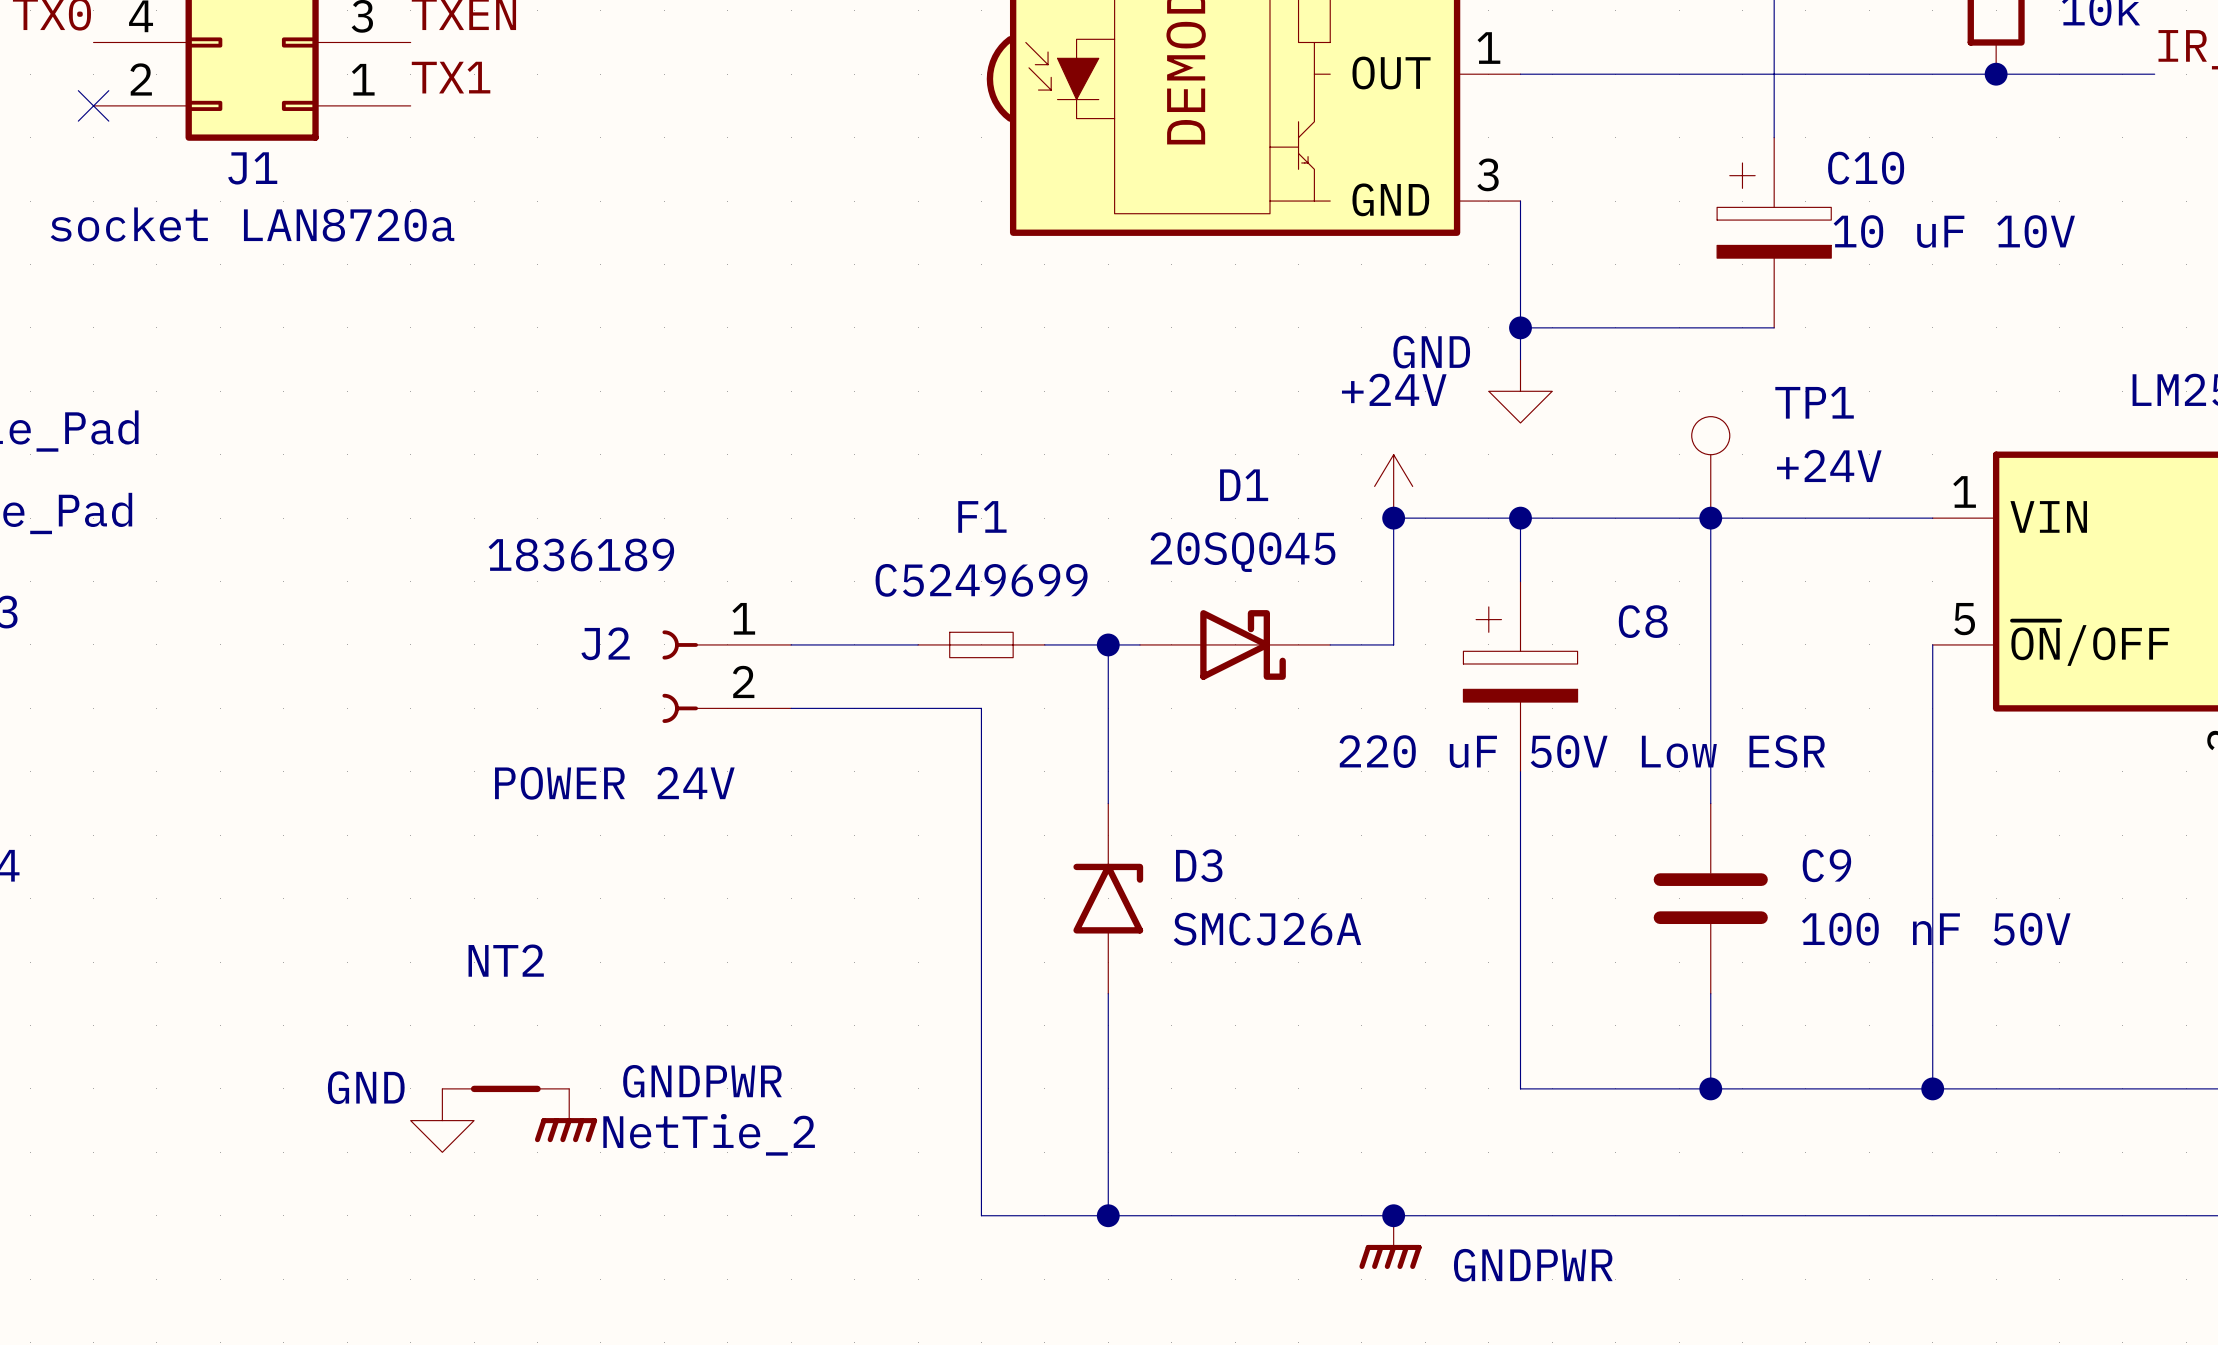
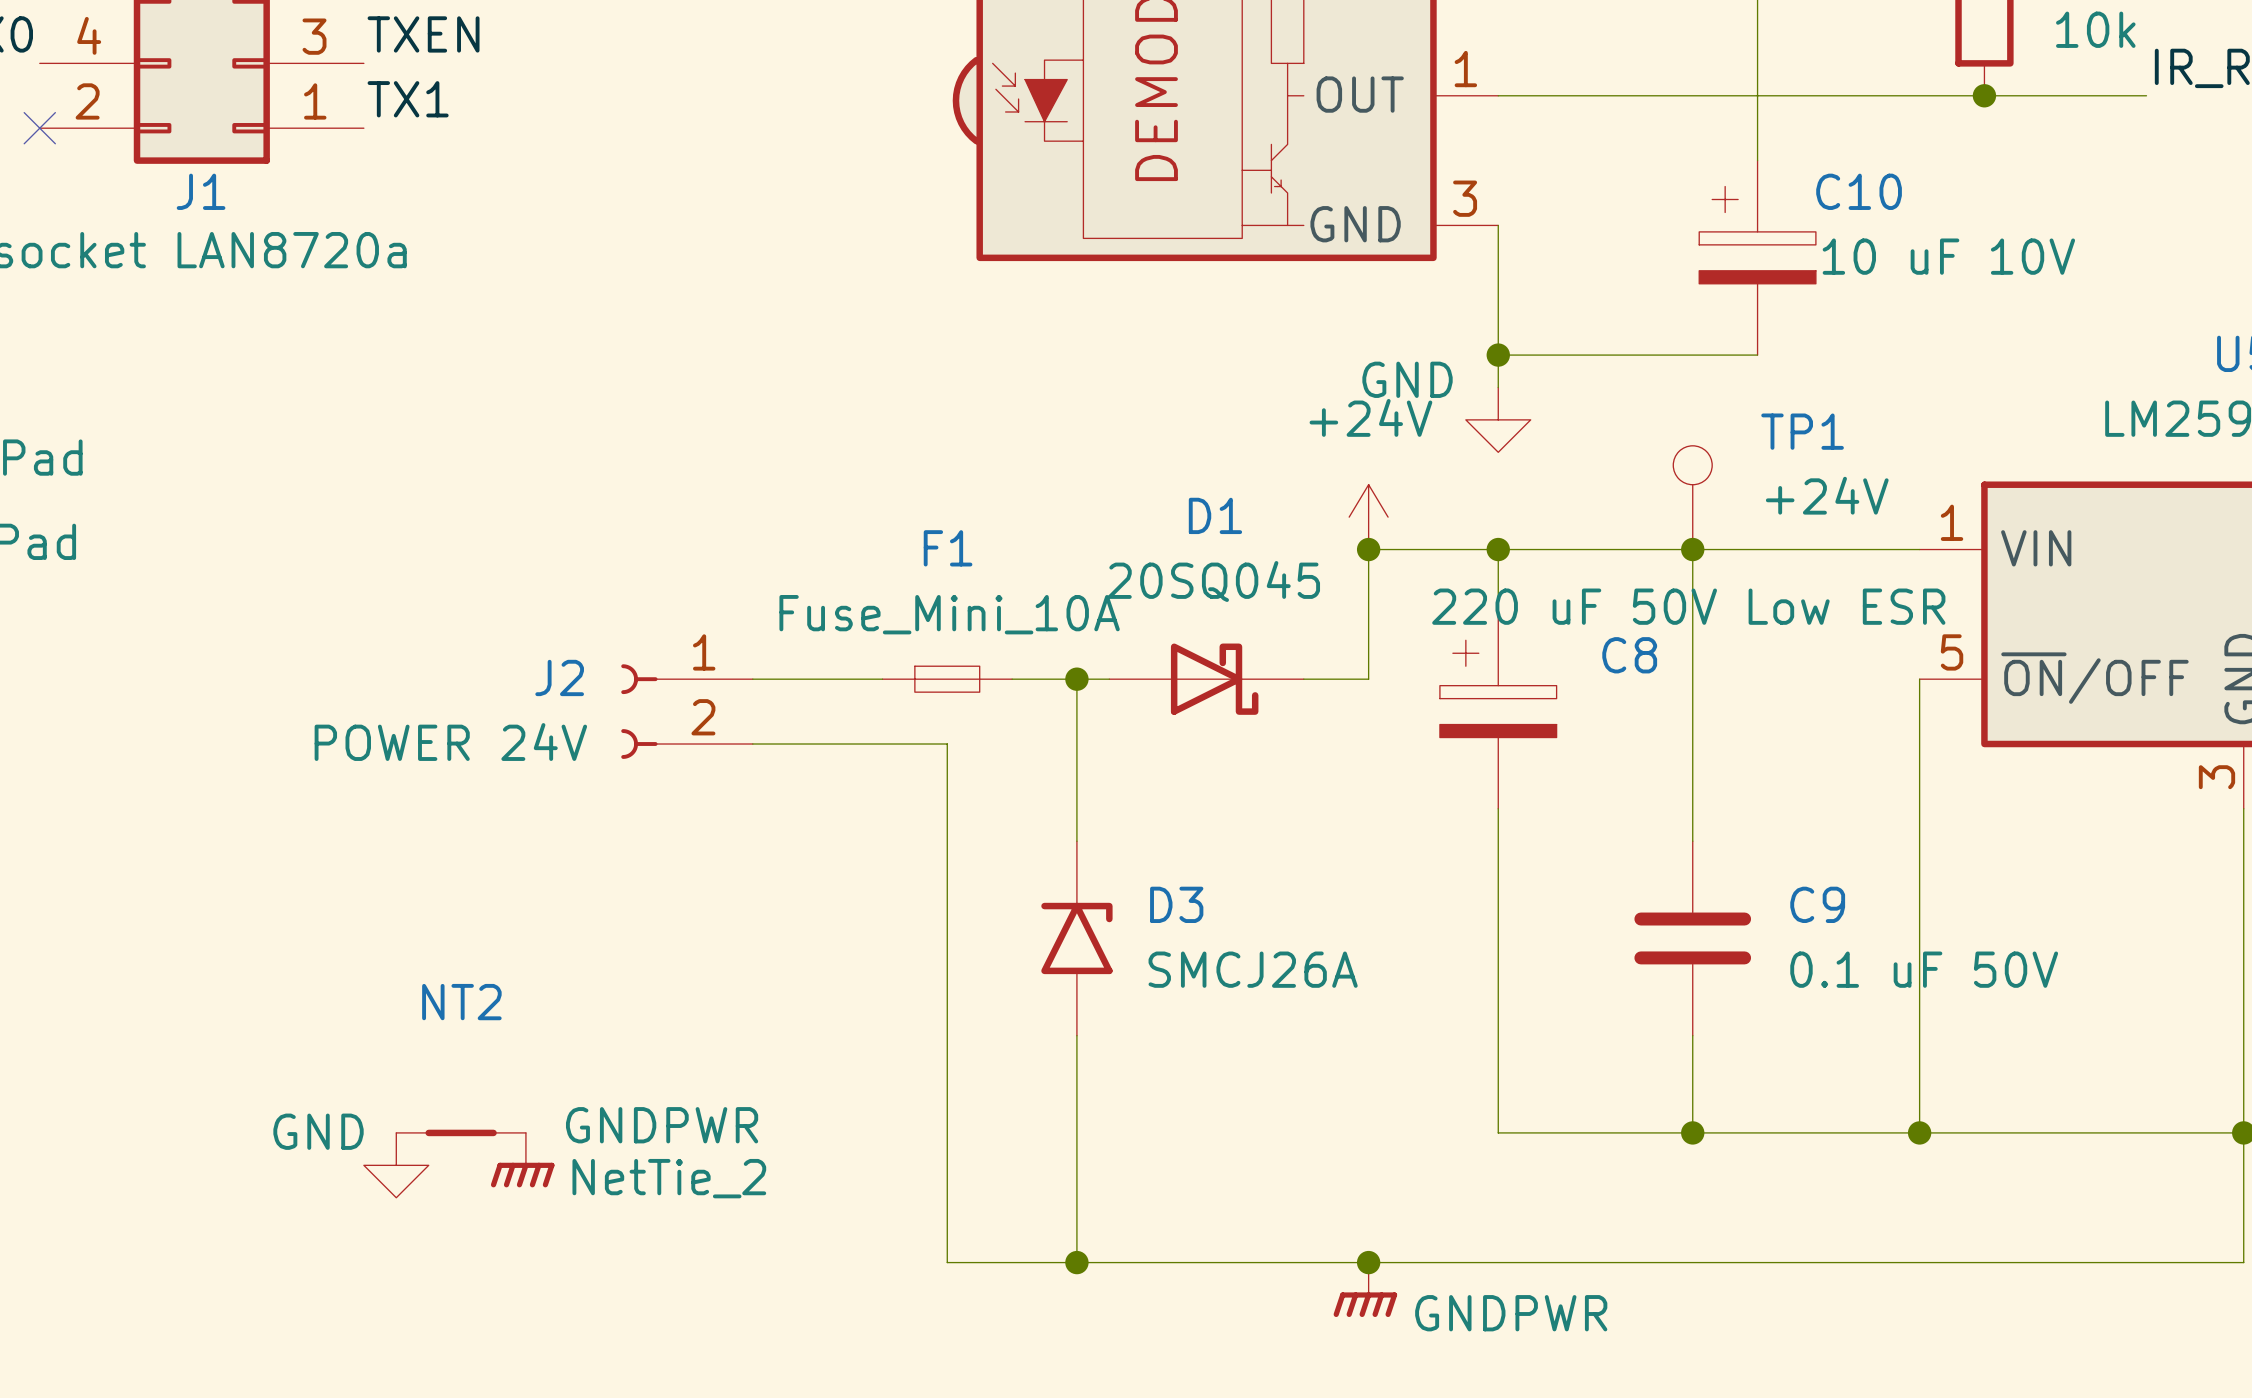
J2 value: 1836189 (581, 554) -> POWER 24V (450, 742)
F1 value: C5249699 (981, 580) -> Fuse_Mini_10A (949, 614)
C8 value position: 220 uF 50V Low ESR (1582, 751) -> 220 uF 50V Low ESR (1688, 606)
J2 text: POWER 24V (614, 783) -> none
C9 value: 100 nF 50V (1936, 929) -> 0.1 uF 50V (1924, 969)

